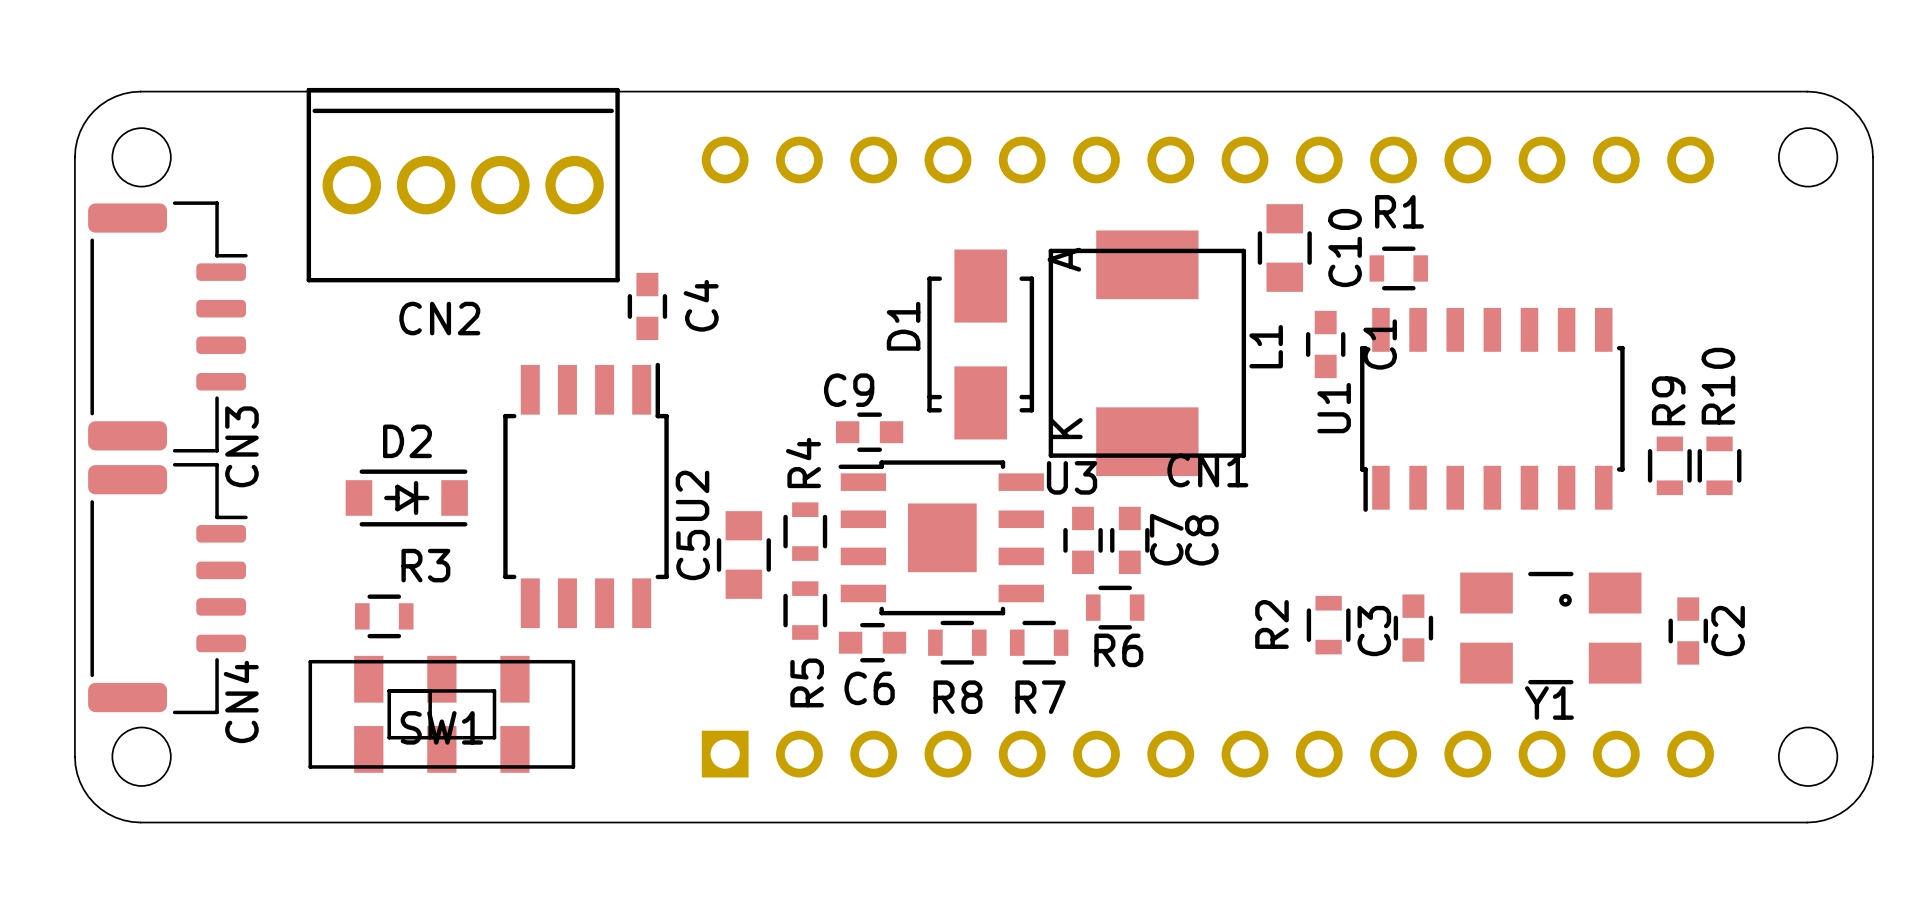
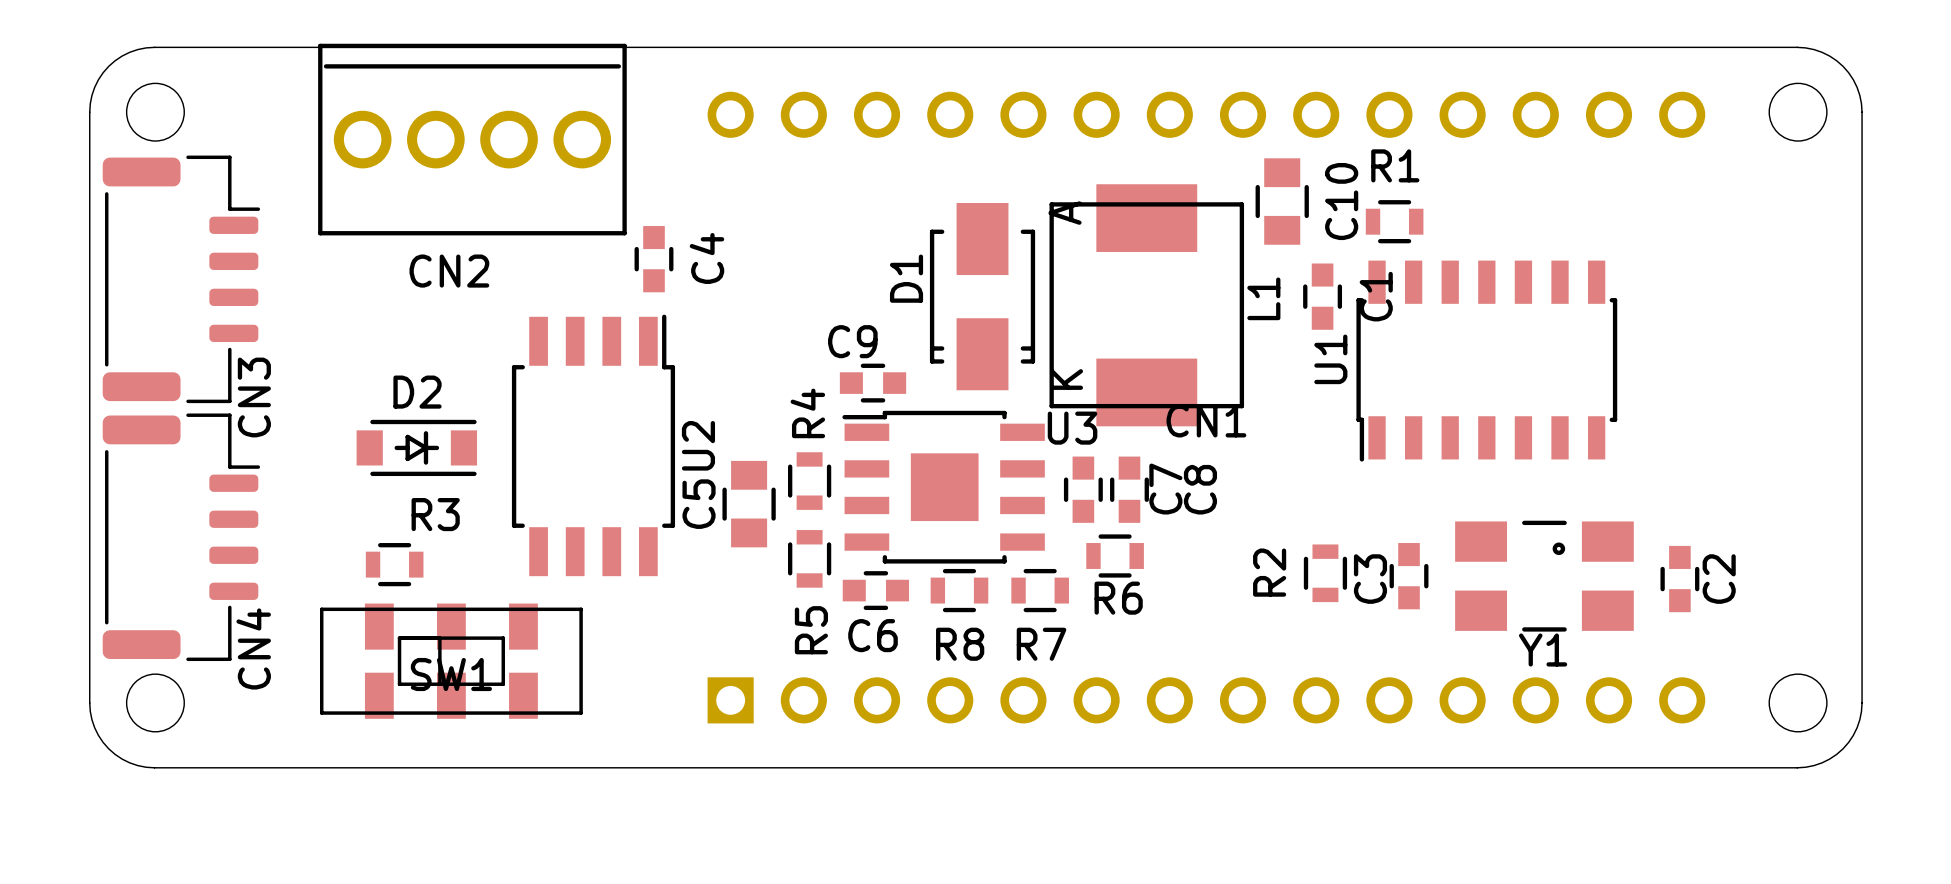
R9: (1669, 465) -> none
R10: (1719, 465) -> none

